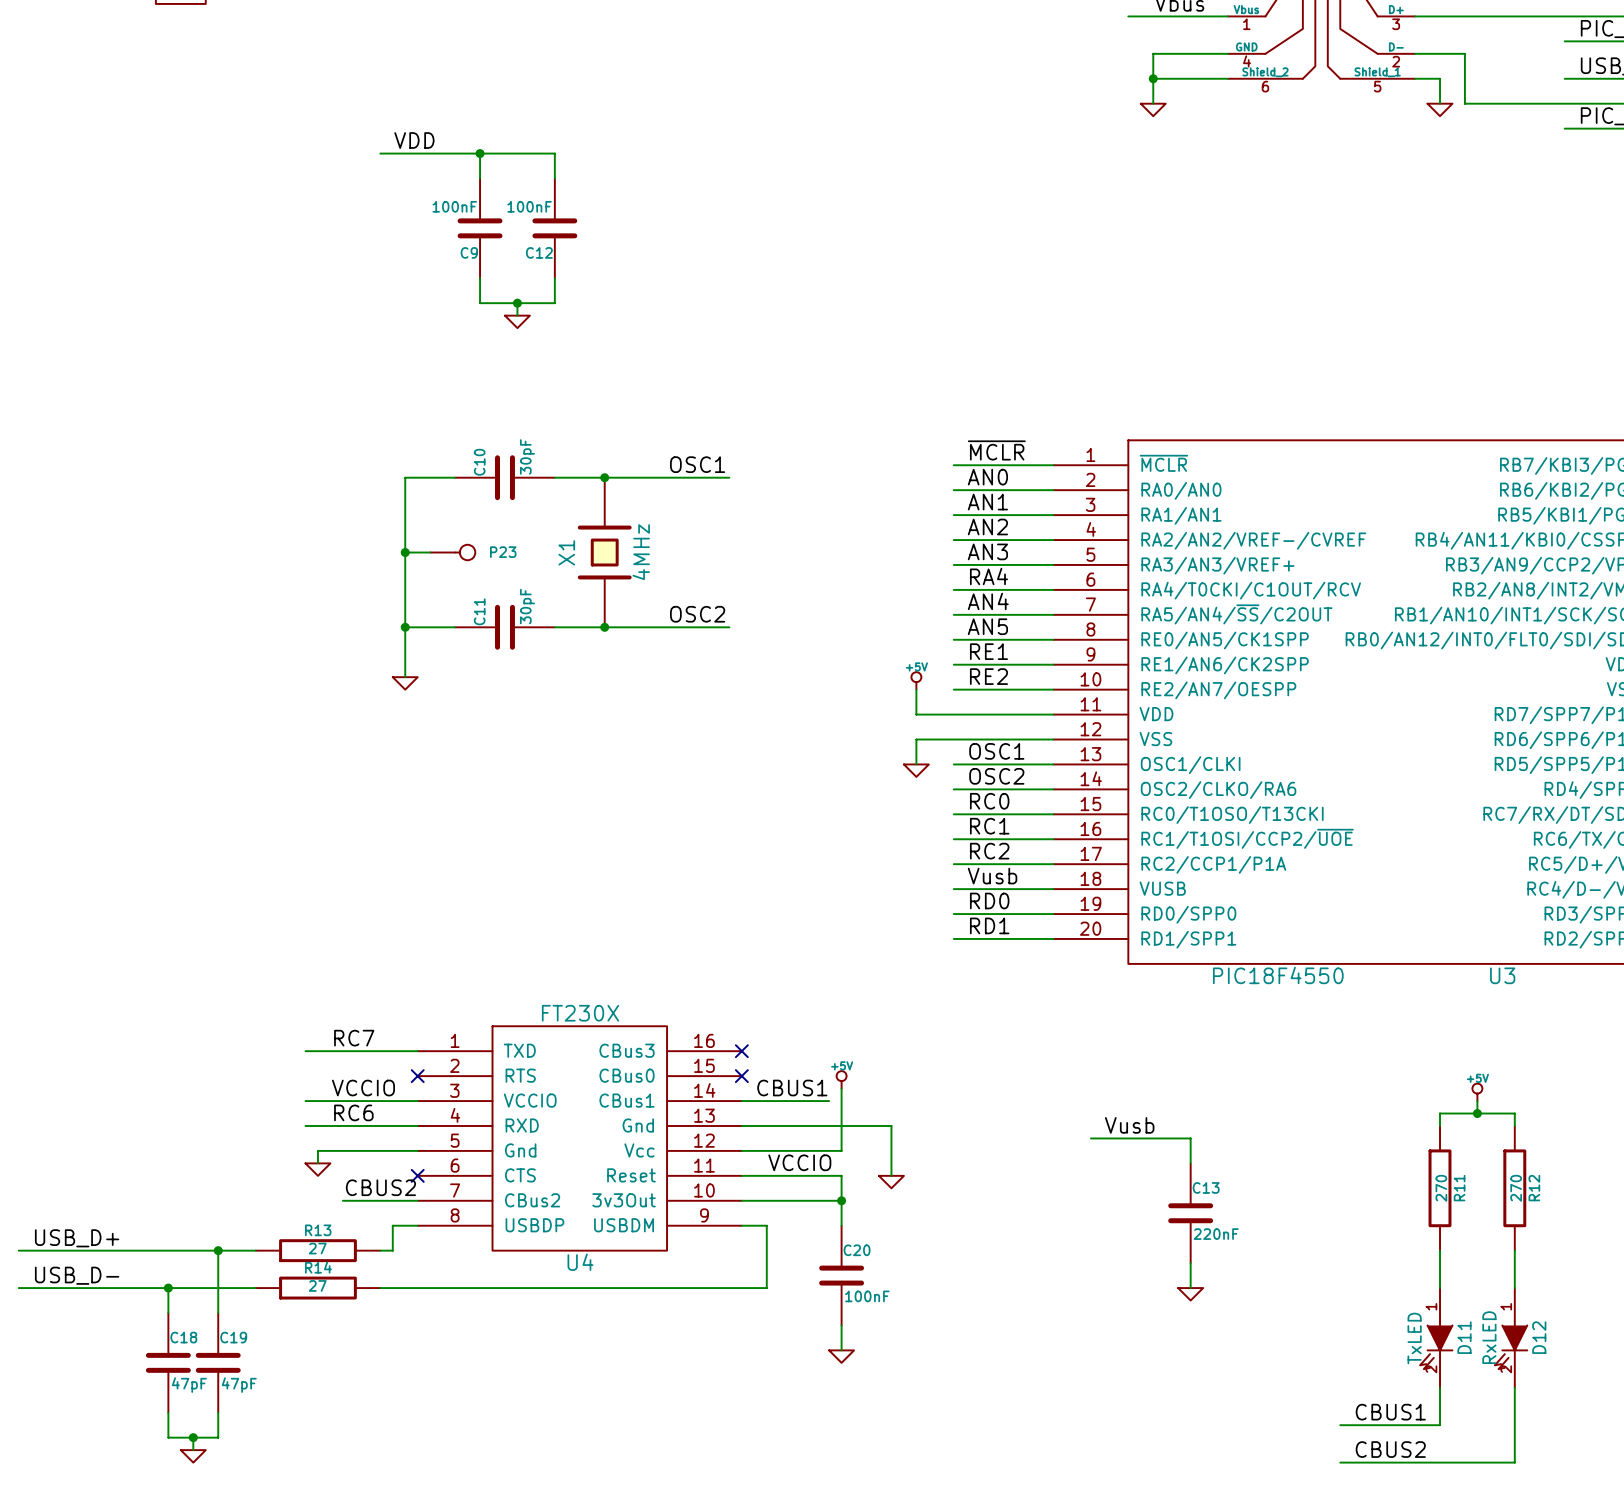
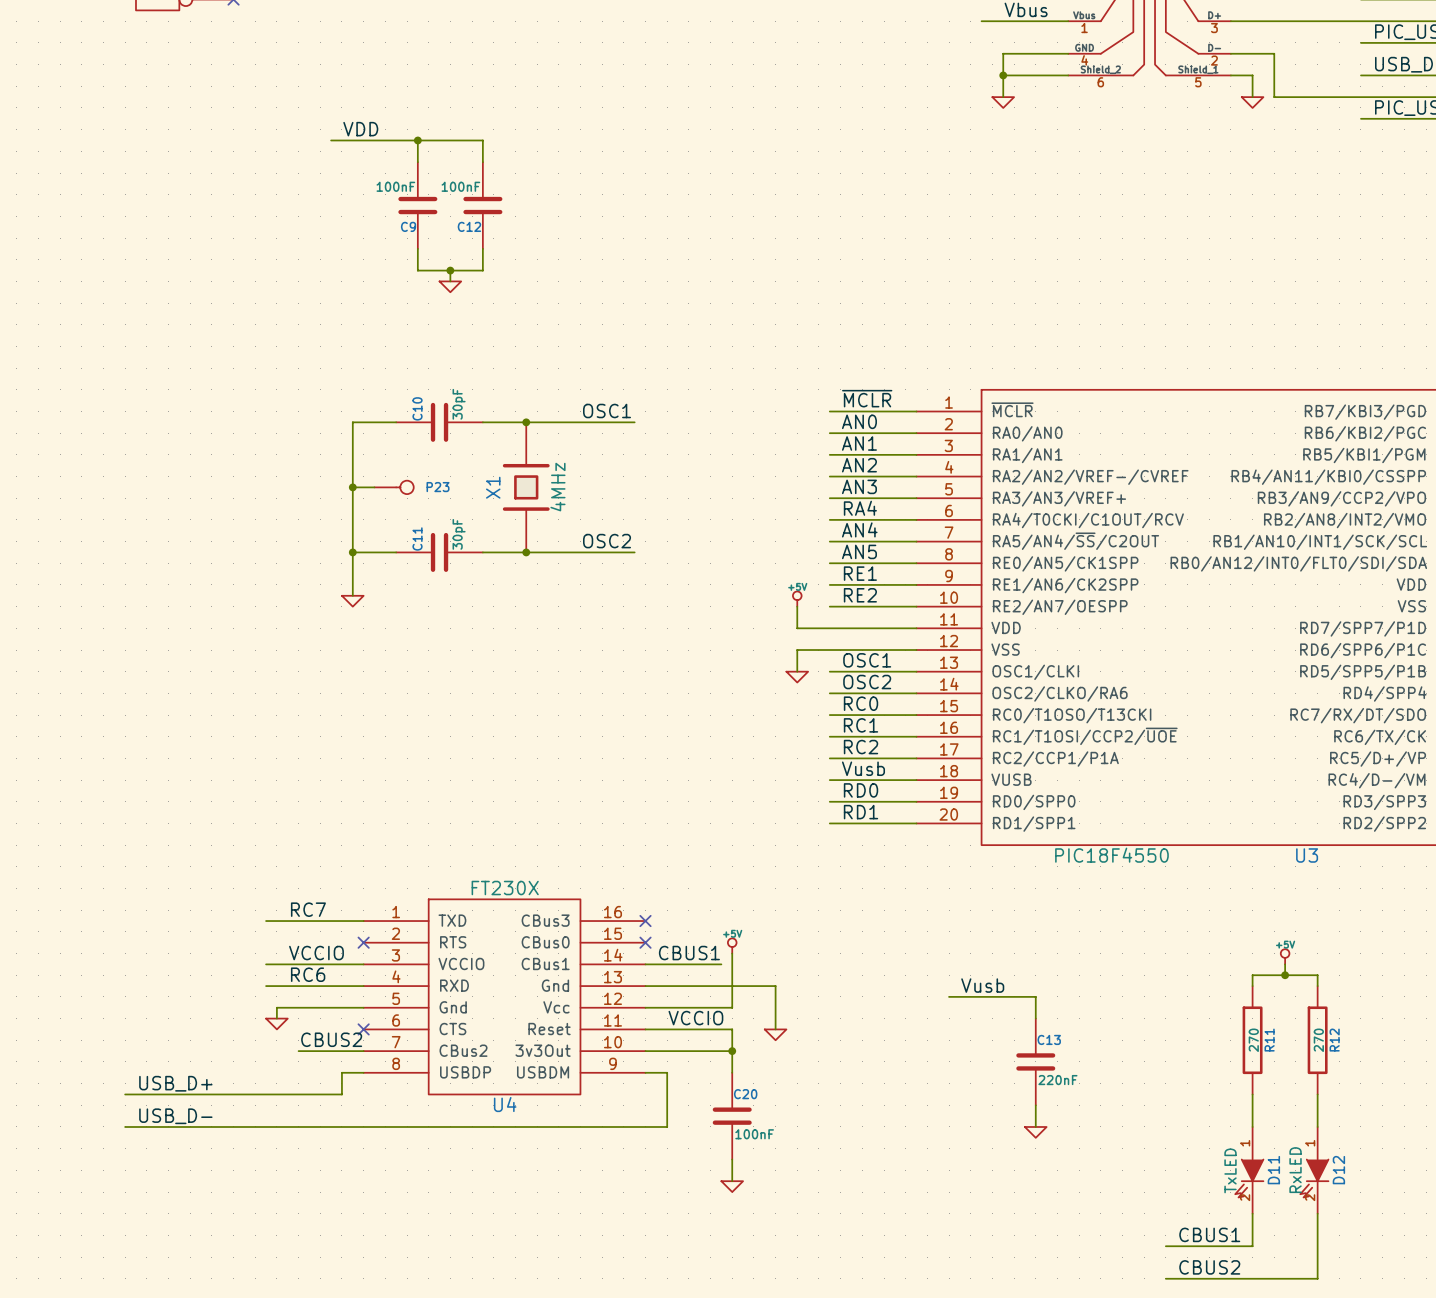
label position: USB_D+ (77, 1238) -> USB_D+ (175, 1083)
wire: (18, 1250) (143, 1250) -> (222, 1094) (331, 1094)
wire: (218, 1250) (218, 1312) -> none
junction: (218, 1250) -> none
R13: 27 (317, 1250) -> none
label position: USB_D- (77, 1275) -> USB_D- (175, 1116)
wire: (18, 1288) (143, 1288) -> (222, 1126) (331, 1126)
wire: (168, 1288) (168, 1312) -> none
junction: (168, 1288) -> none
R14: 27 (317, 1288) -> none
C18: 47pF (168, 1362) -> none
C19: 47pF (218, 1362) -> none
wire: (168, 1412) (168, 1437) (218, 1437) (218, 1412) -> none
wire: (193, 1437) (193, 1450) -> none
junction: (193, 1437) -> none
power symbol: (193, 1456) -> none

